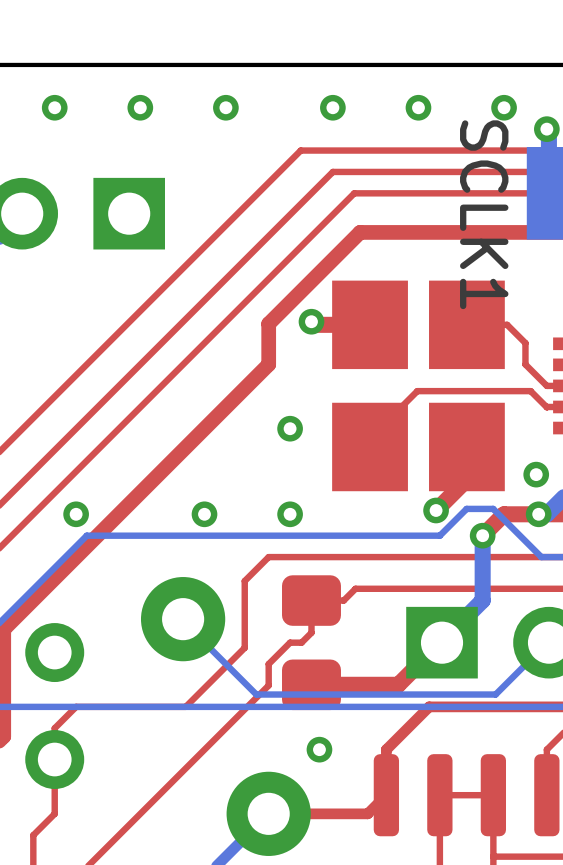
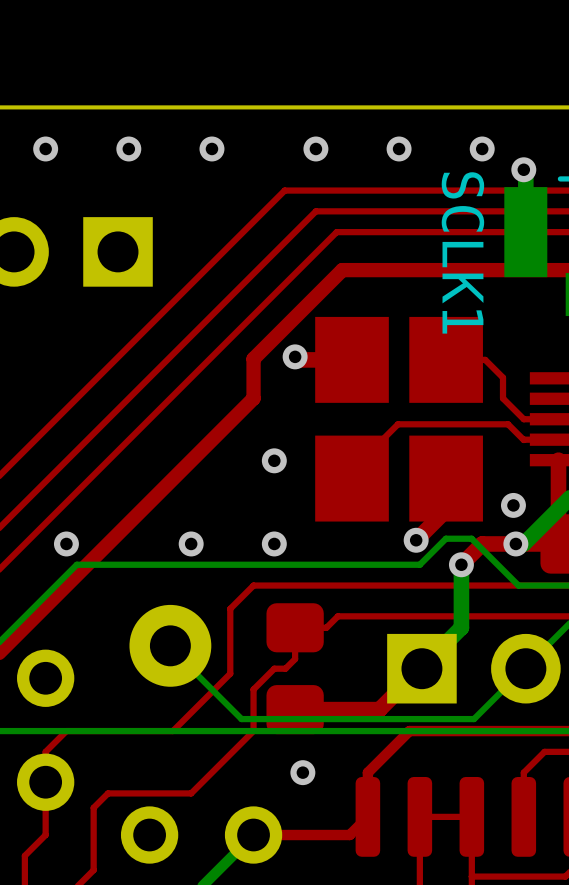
top track: (268, 685) (104, 850) -> (253, 710) (253, 731) (191, 793) (108, 793) (93, 807) (93, 870)
part: none -> (201, 835)
part: (268, 813) -> none

